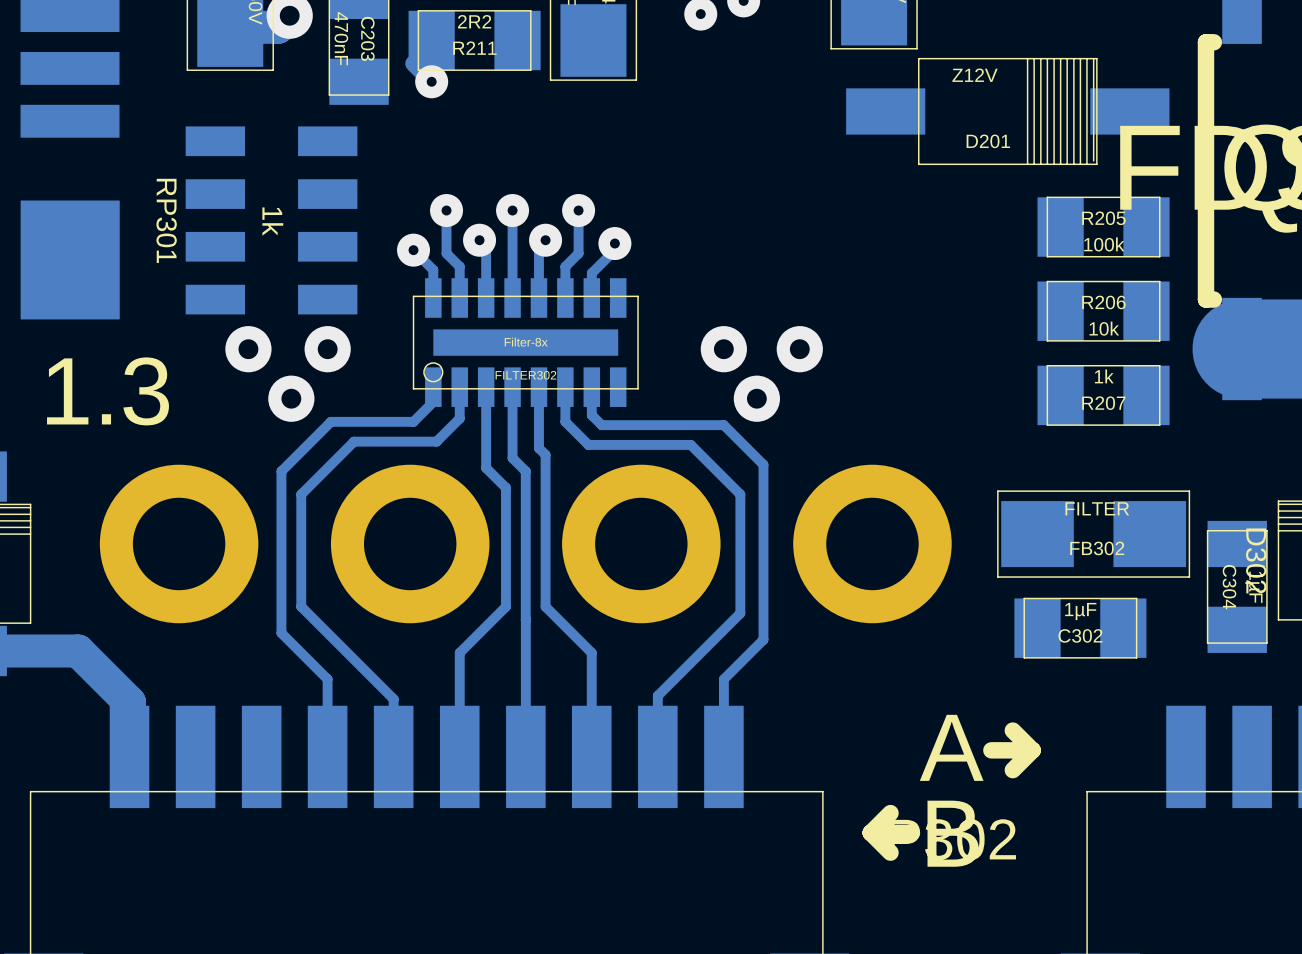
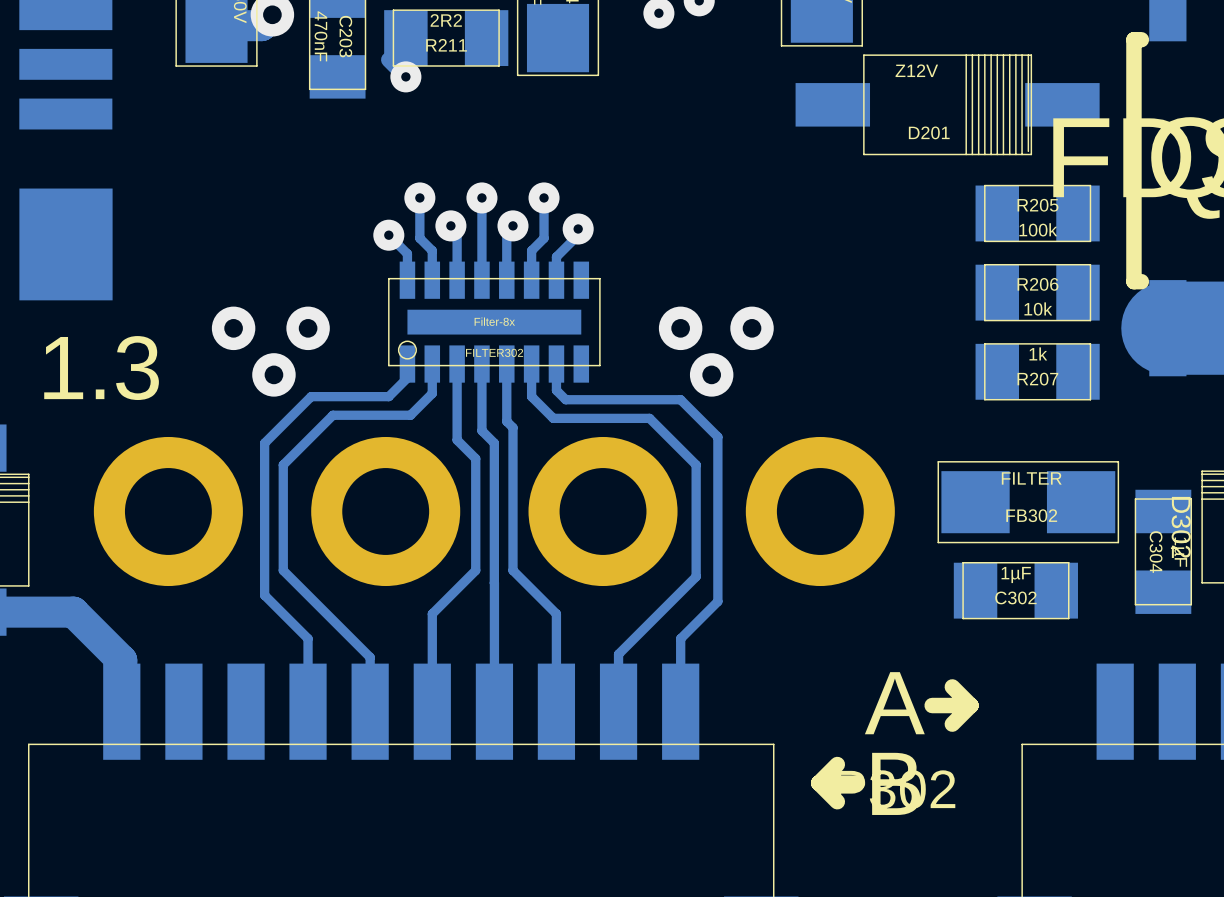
RP301: 1k (271, 220) -> none

